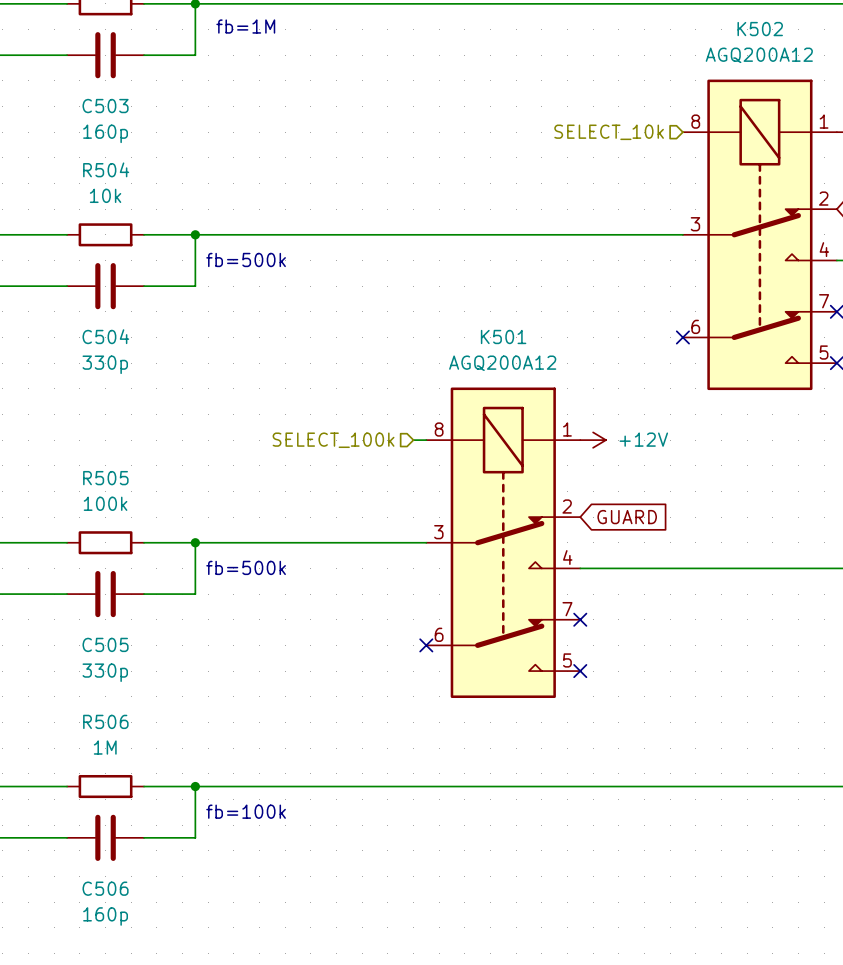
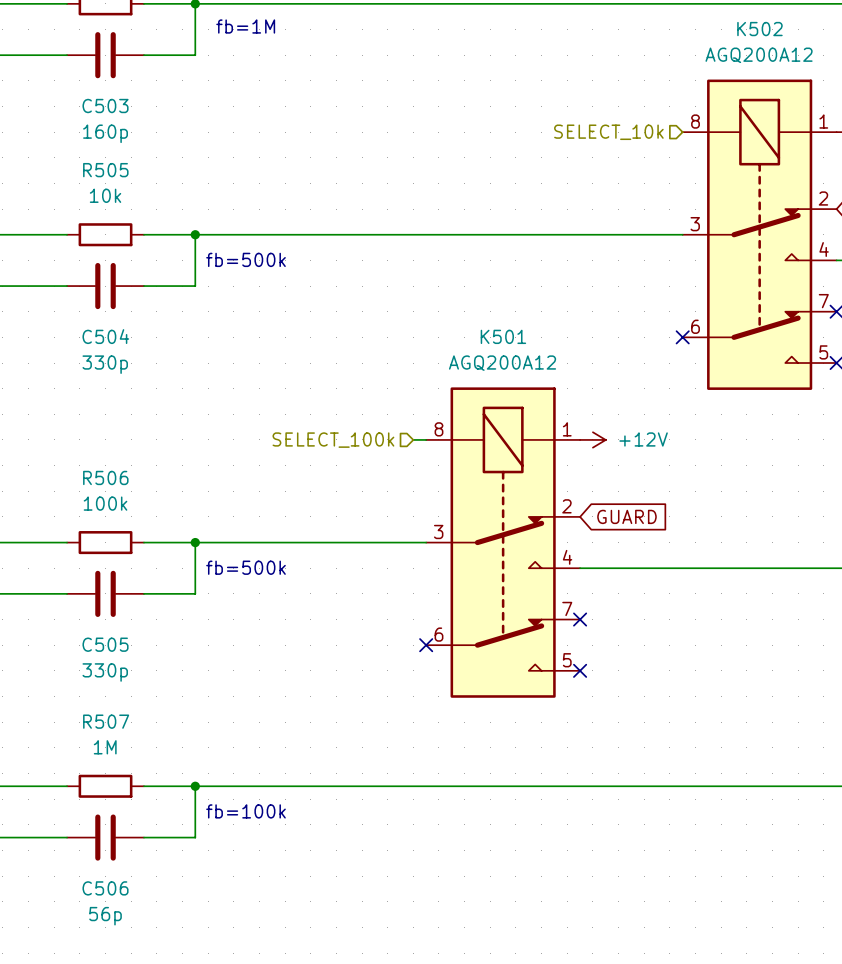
R504 name: R504 (106, 169) -> R505 (105, 170)
R505 name: R505 (105, 478) -> R506 (105, 477)
R506 name: R506 (105, 721) -> R507 (106, 721)
C506 value: 160p (105, 916) -> 56p (105, 916)

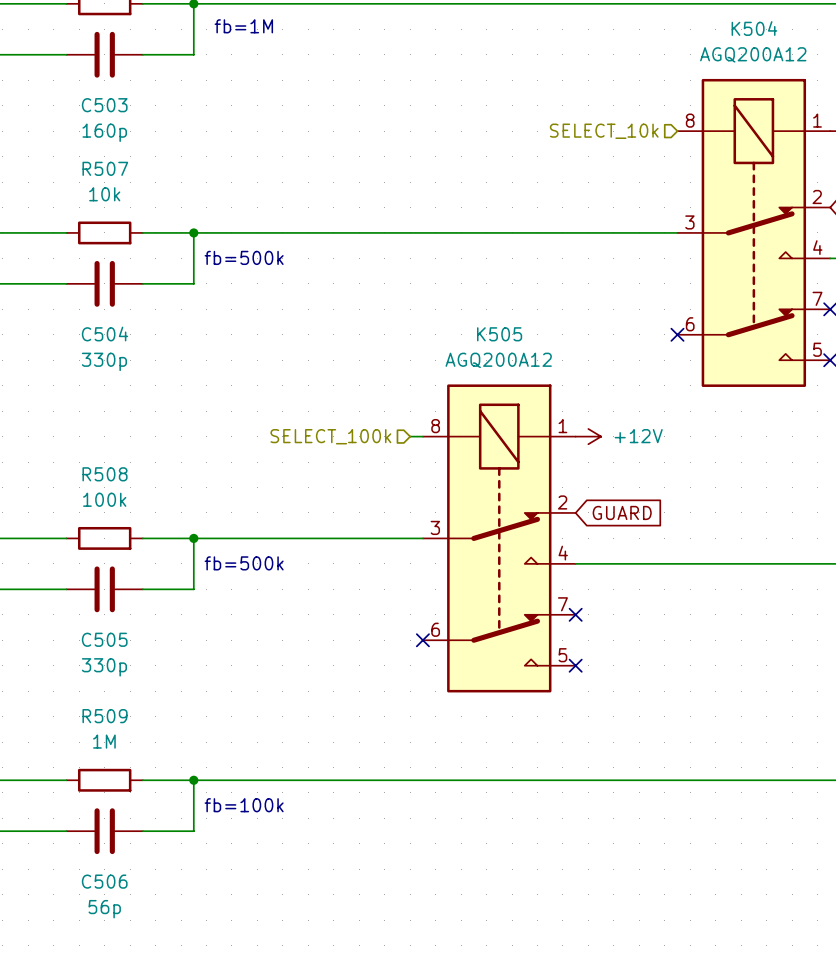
K502 name: K502 (759, 29) -> K504 (754, 28)
R505 name: R505 (105, 170) -> R507 (105, 168)
K501 name: K501 (503, 336) -> K505 (499, 334)
R506 name: R506 (105, 477) -> R508 (105, 474)
R507 name: R507 (106, 721) -> R509 (105, 716)

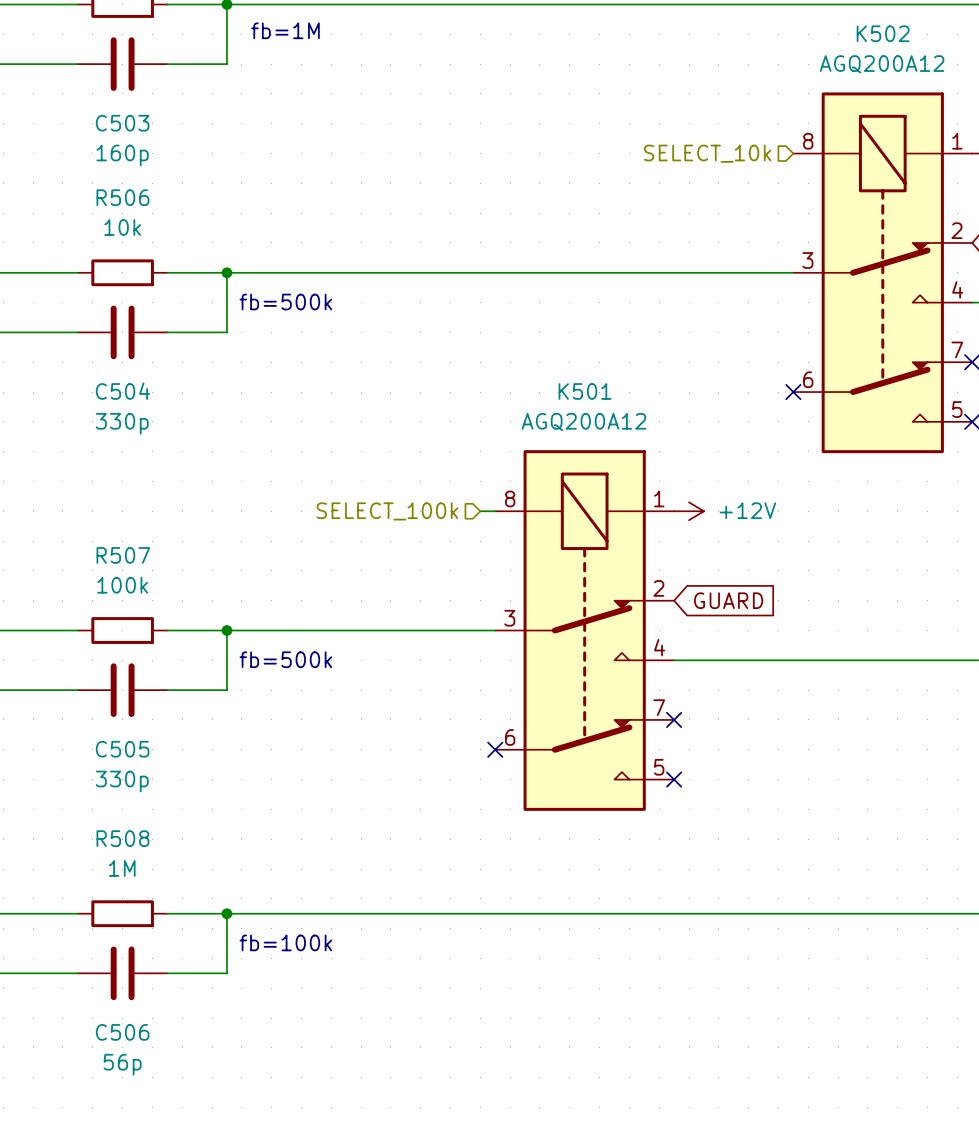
K504 name: K504 (754, 28) -> K502 (883, 33)
R507 name: R507 (105, 168) -> R506 (122, 197)
K505 name: K505 (499, 334) -> K501 (585, 391)
R508 name: R508 (105, 474) -> R507 (123, 555)
R509 name: R509 (105, 716) -> R508 (122, 838)

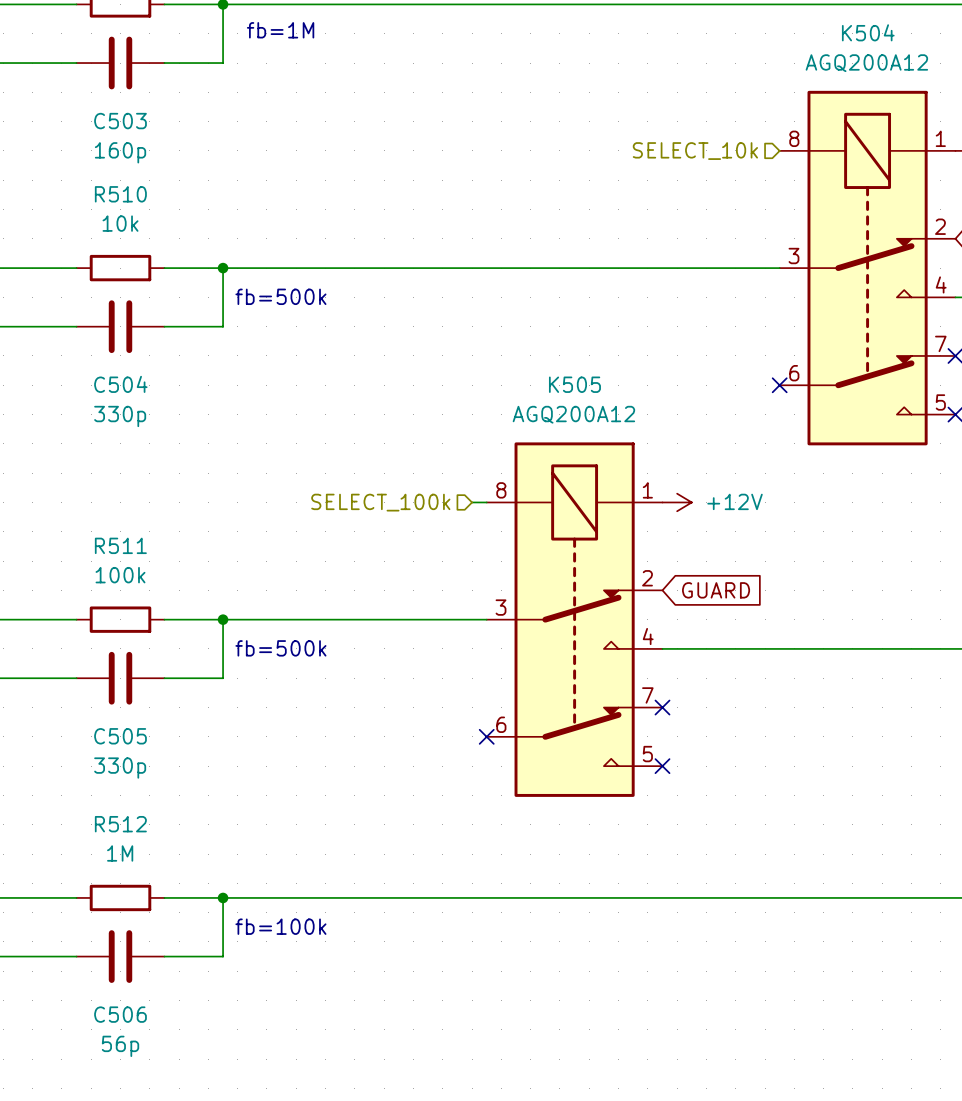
K502 name: K502 (883, 33) -> K504 (868, 32)
R506 name: R506 (122, 197) -> R510 (120, 194)
K501 name: K501 (585, 391) -> K505 (574, 384)
R507 name: R507 (123, 555) -> R511 (120, 545)
R508 name: R508 (122, 838) -> R512 (120, 824)

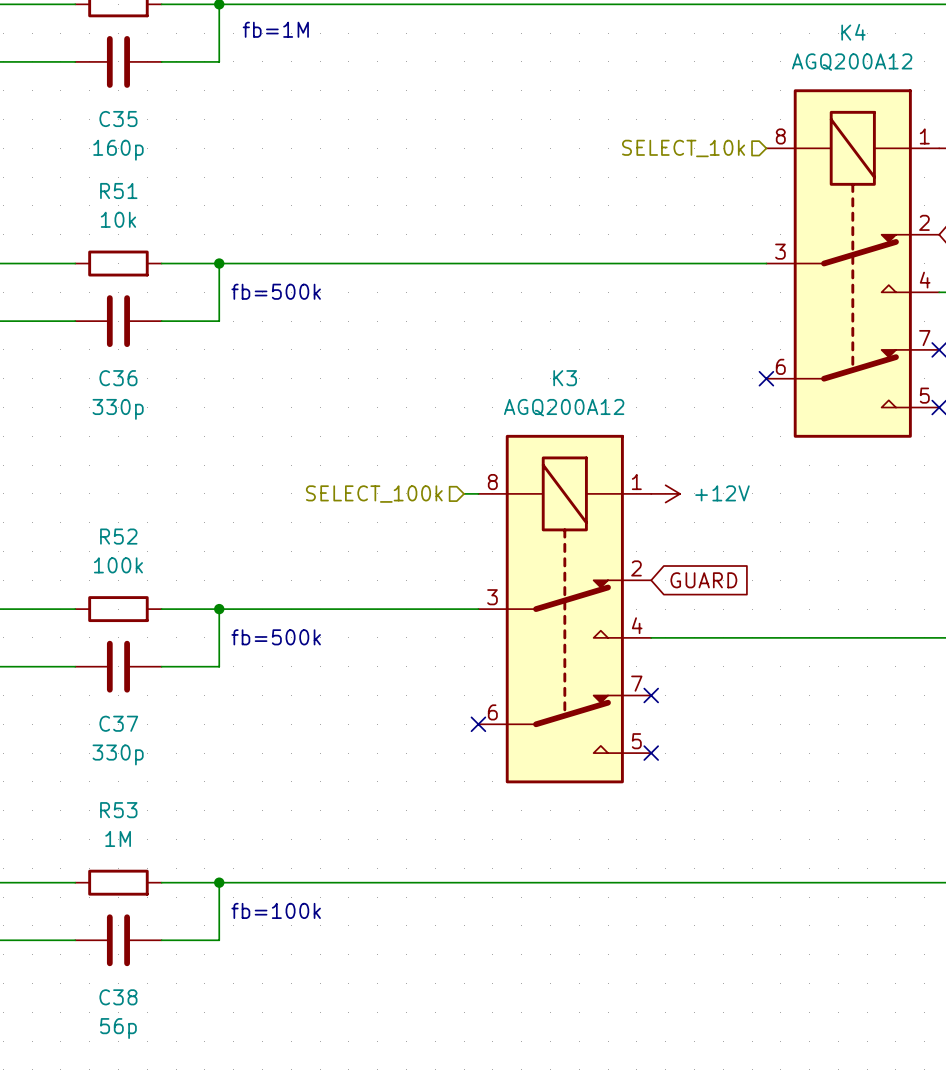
K504 name: K504 (868, 32) -> K4 (853, 32)
C503 name: C503 (120, 121) -> C35 (118, 119)
R510 name: R510 (120, 194) -> R51 (118, 190)
C504 name: C504 (120, 384) -> C36 (118, 378)
K505 name: K505 (574, 384) -> K3 (565, 378)
R511 name: R511 (120, 545) -> R52 (118, 536)
C505 name: C505 (120, 736) -> C37 (118, 723)
R512 name: R512 (120, 824) -> R53 (118, 810)
C506 name: C506 (120, 1014) -> C38 (118, 997)

